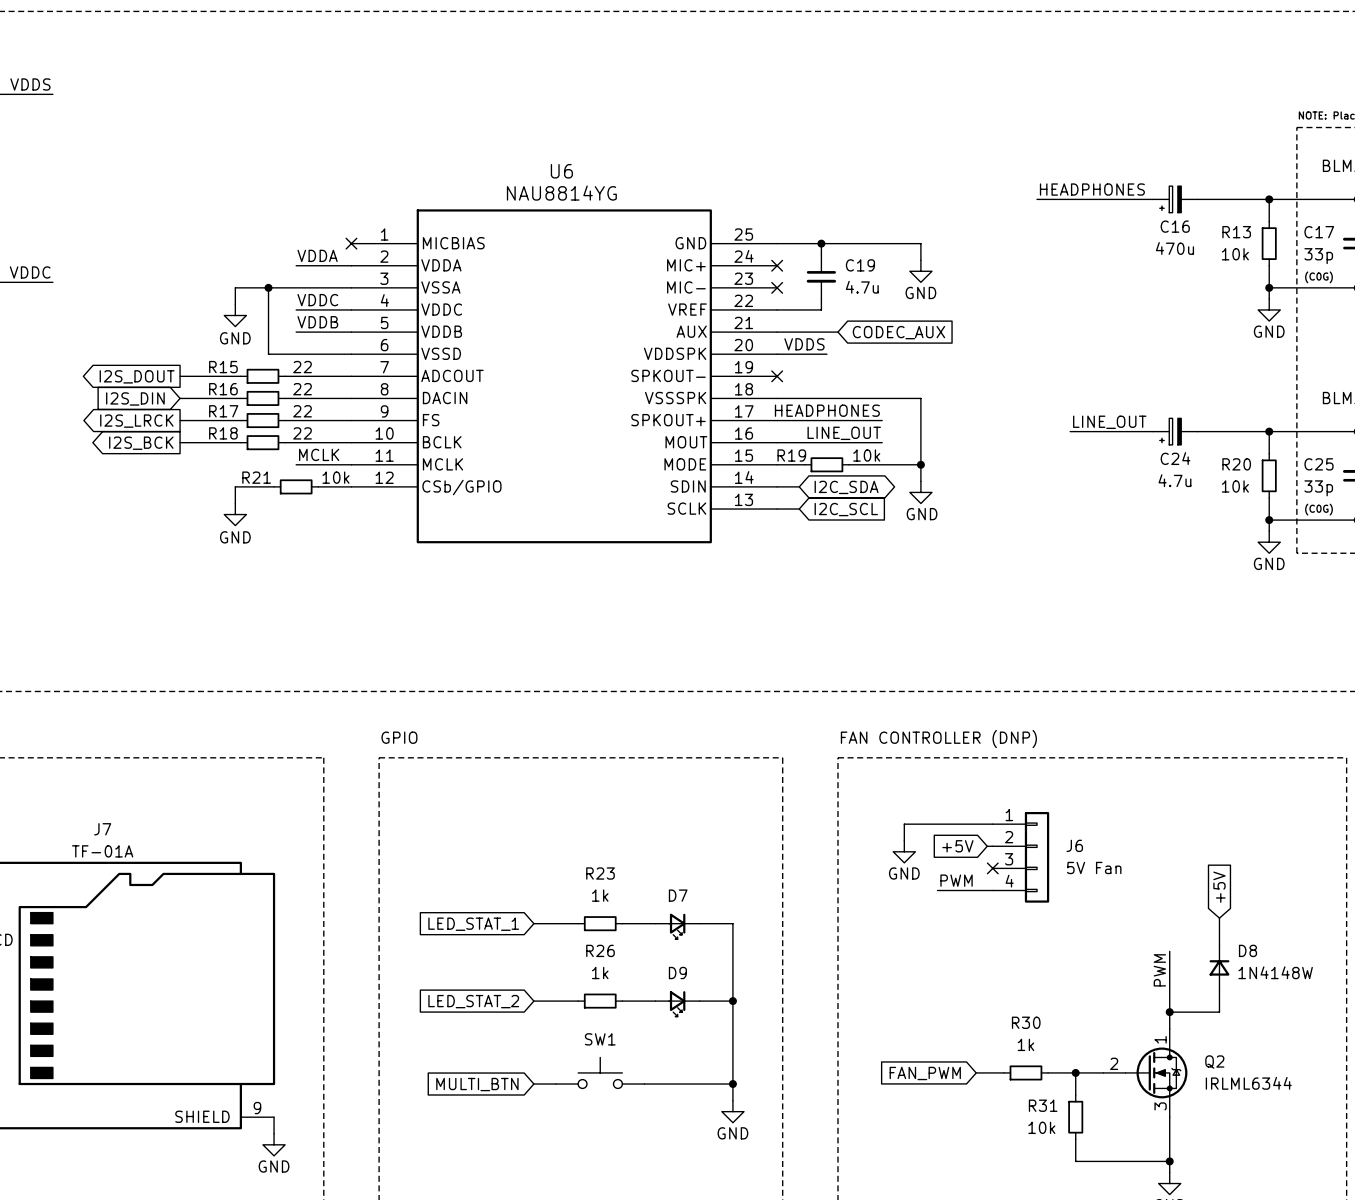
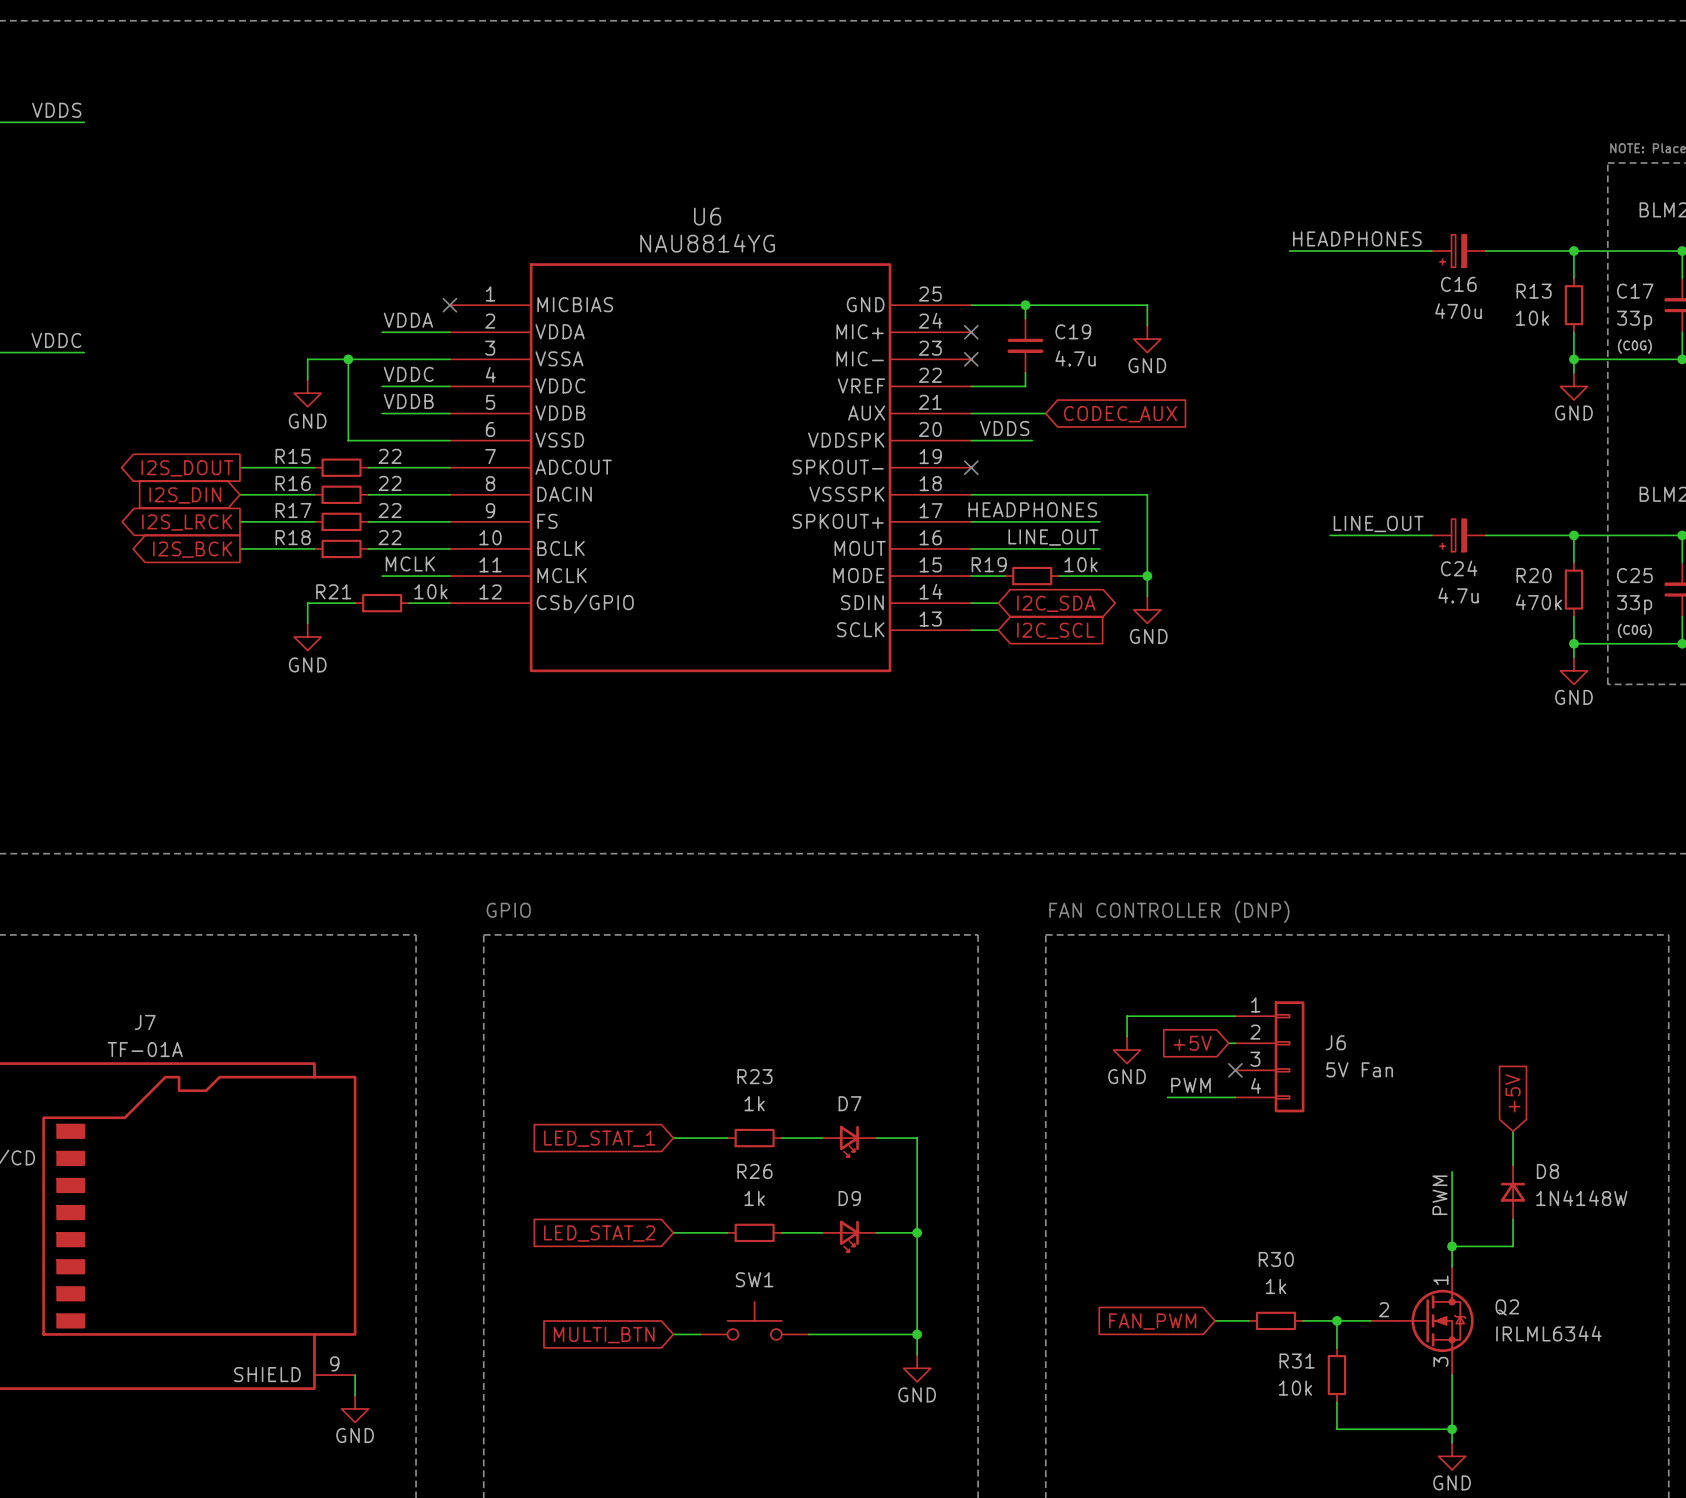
R20 value: 10k (1235, 486) -> 470k (1538, 602)

